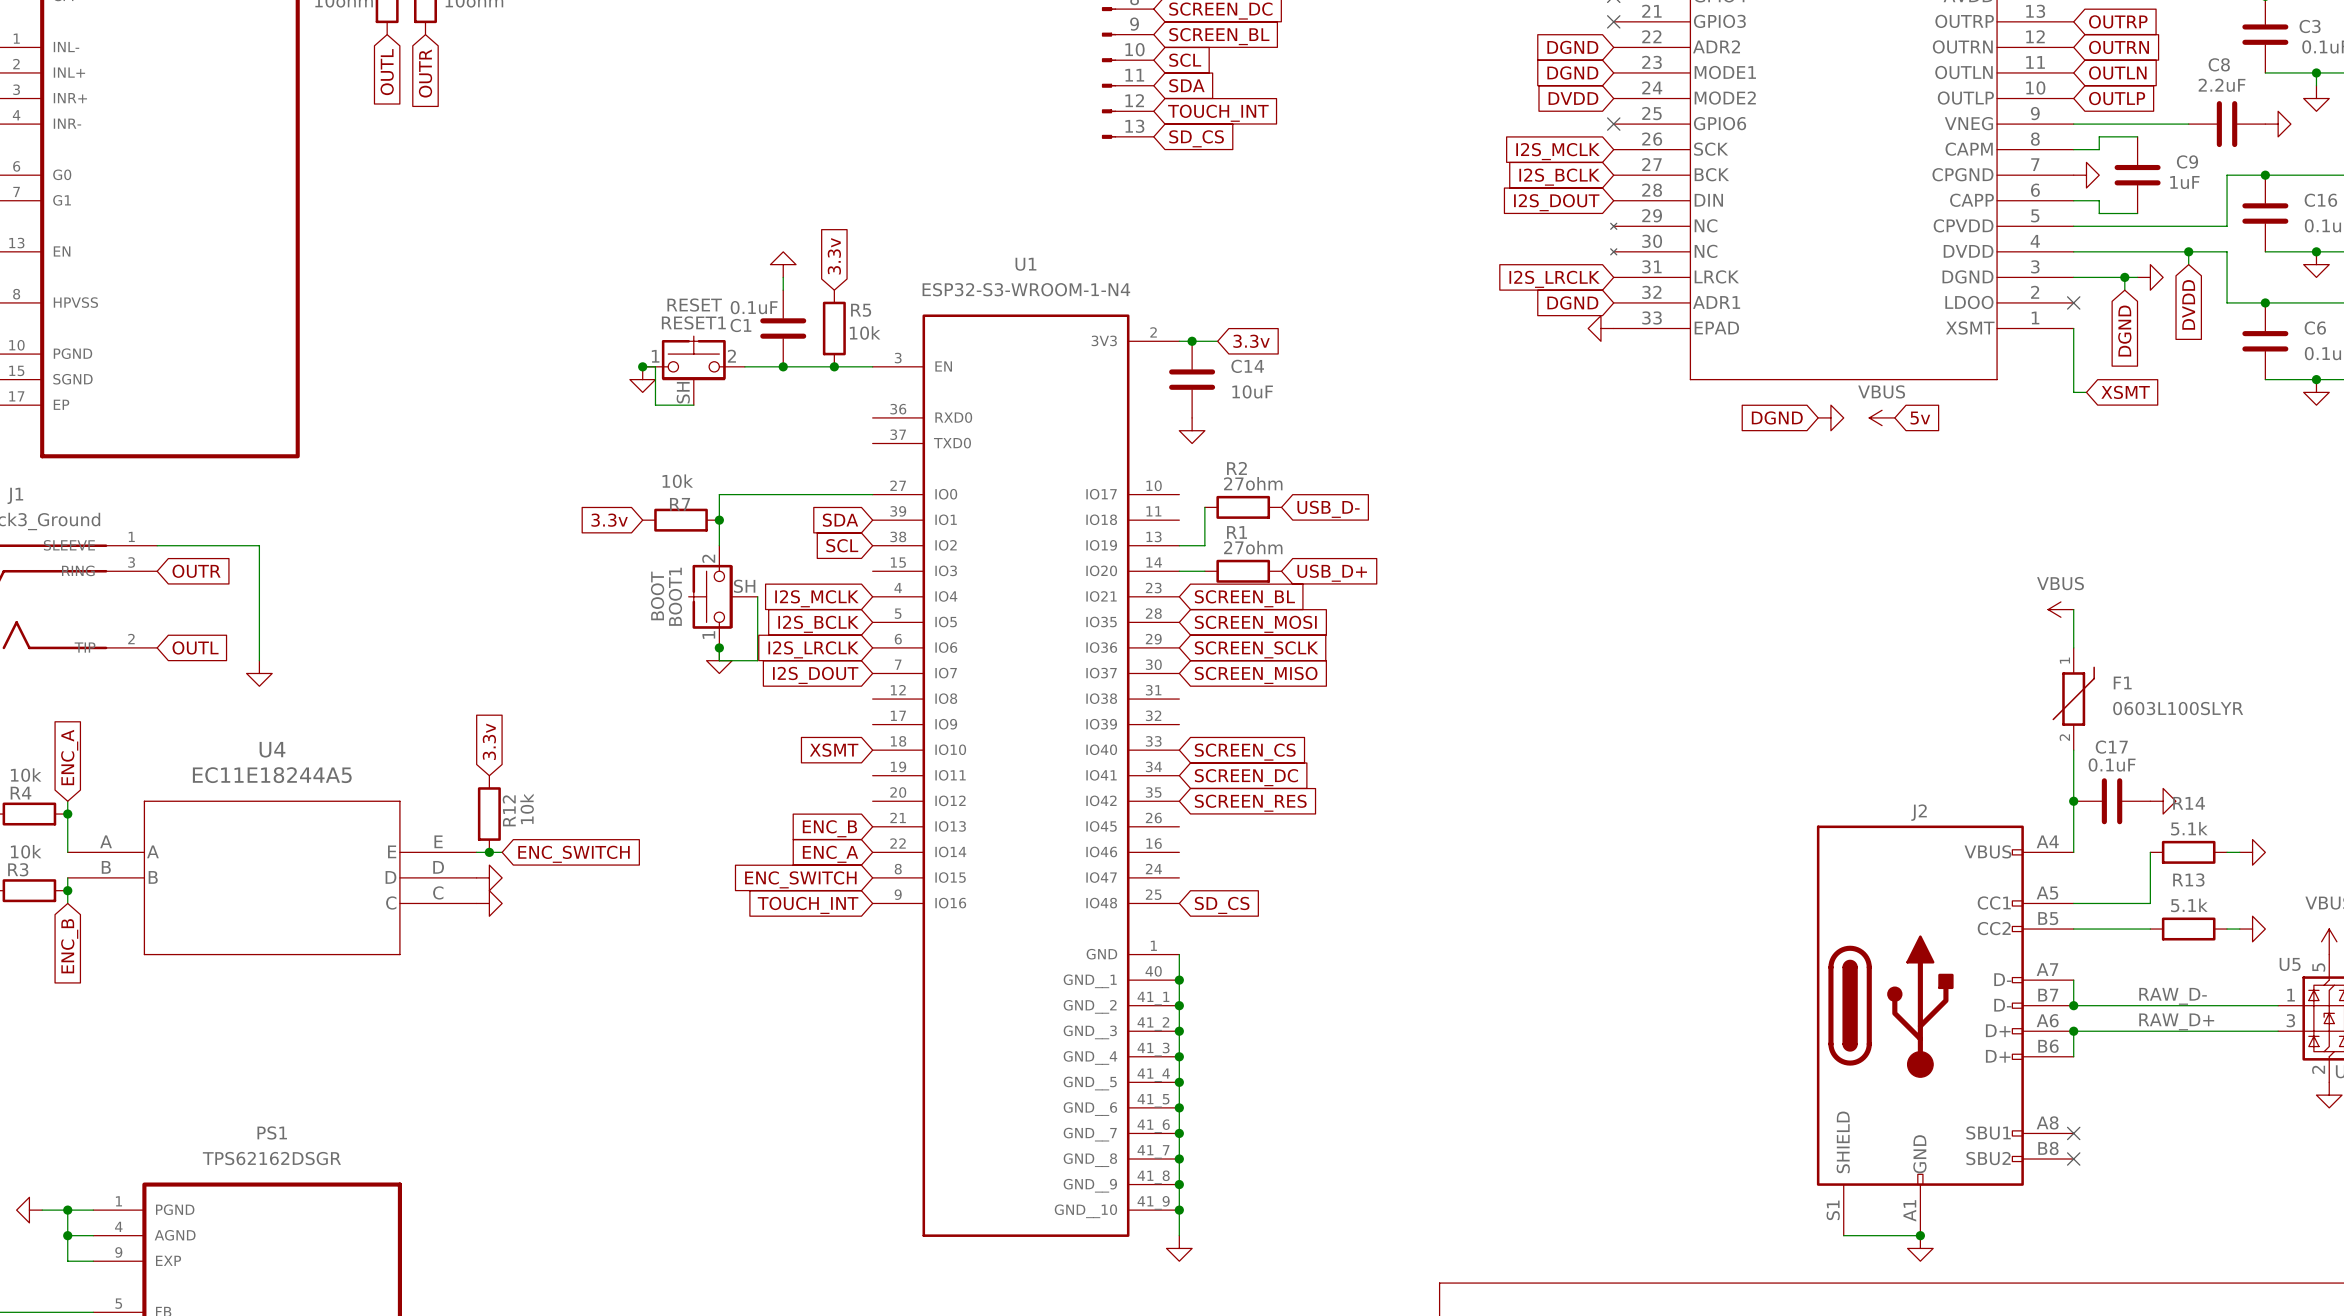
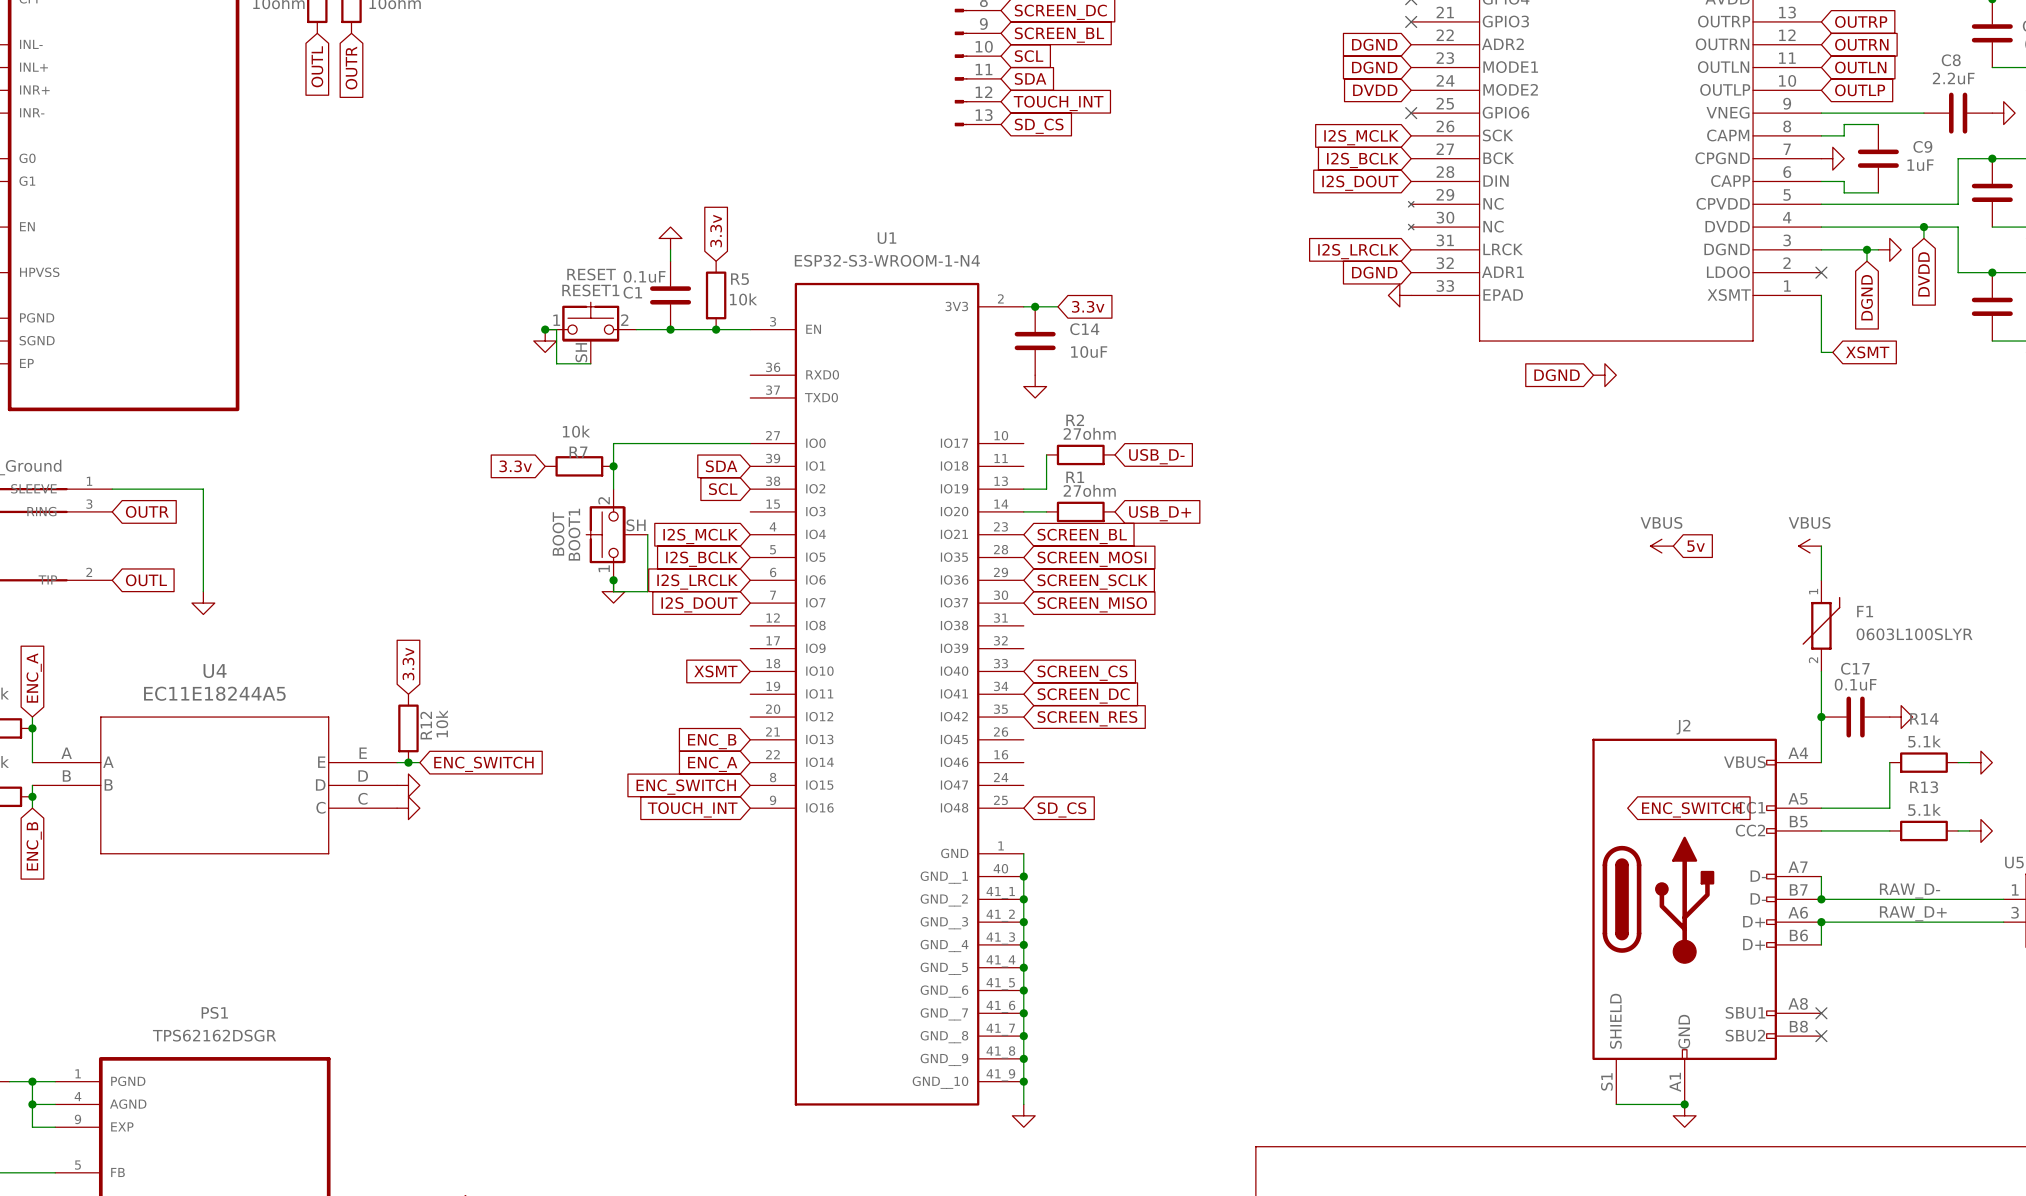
power symbol position: VBUS (1882, 417) -> VBUS (1661, 546)
global label position: 5v (1920, 418) -> 5v (1696, 546)
global label: none -> ENC_SWITCH (1691, 809)

